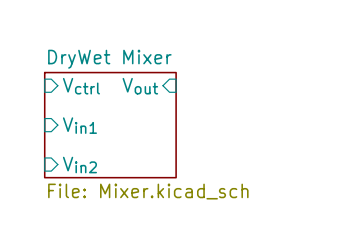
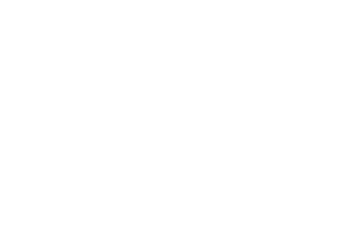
sheet pin: Vctrl (81, 86) -> none
sheet pin: Vout (140, 86) -> none
sheet pin: Vin1 (79, 125) -> none
sheet DryWet Mixer: File: Mixer.kicad_sch (110, 125) -> none
sheet pin: Vin2 (79, 165) -> none

